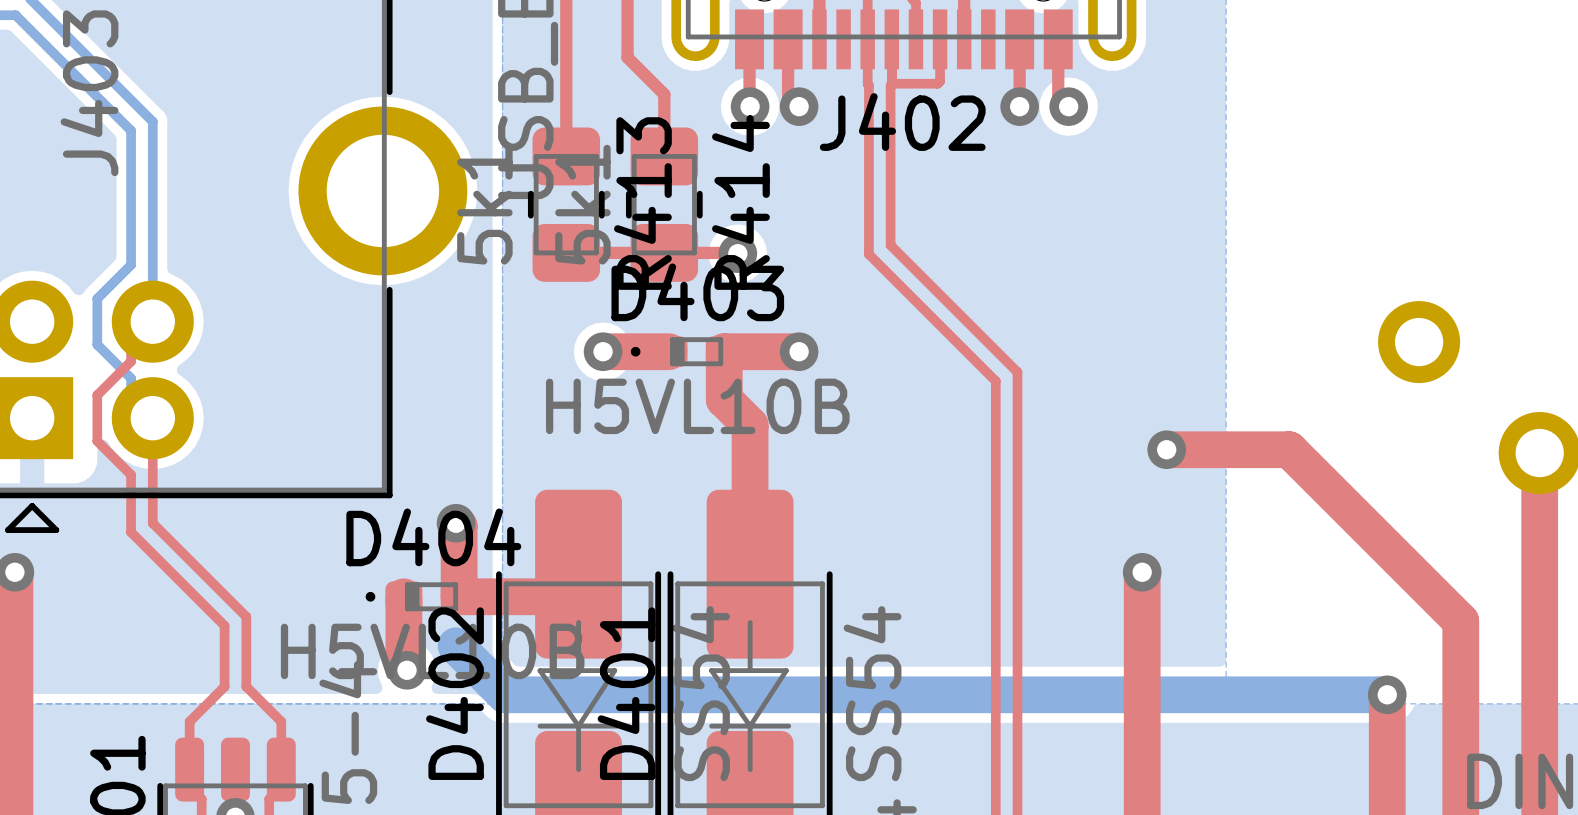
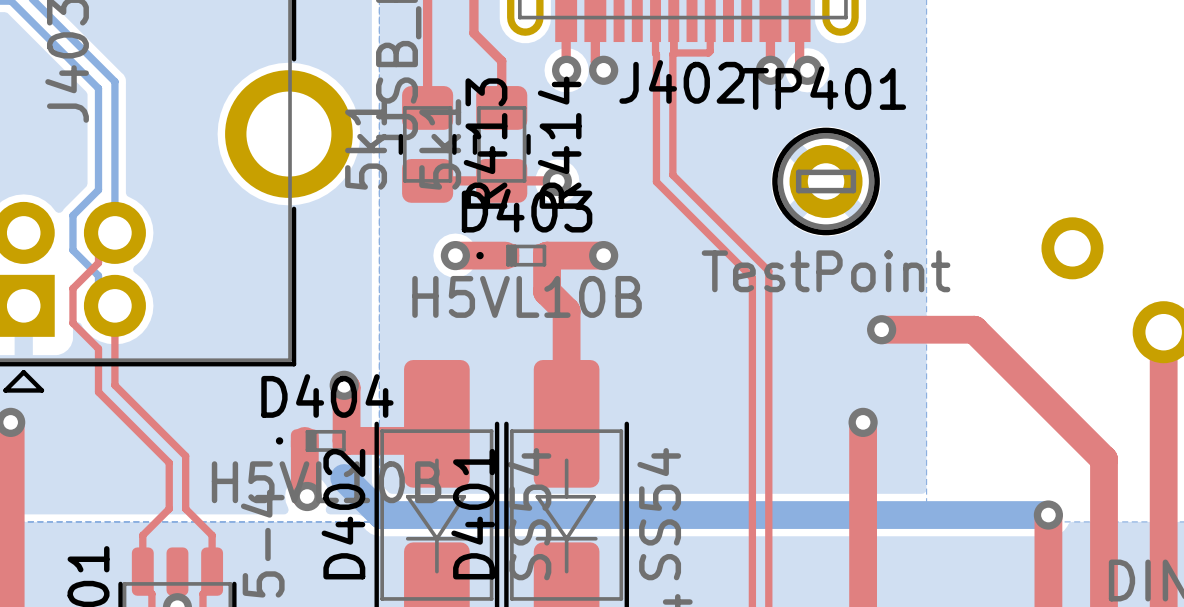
TP401: none -> TestPoint (826, 181)

